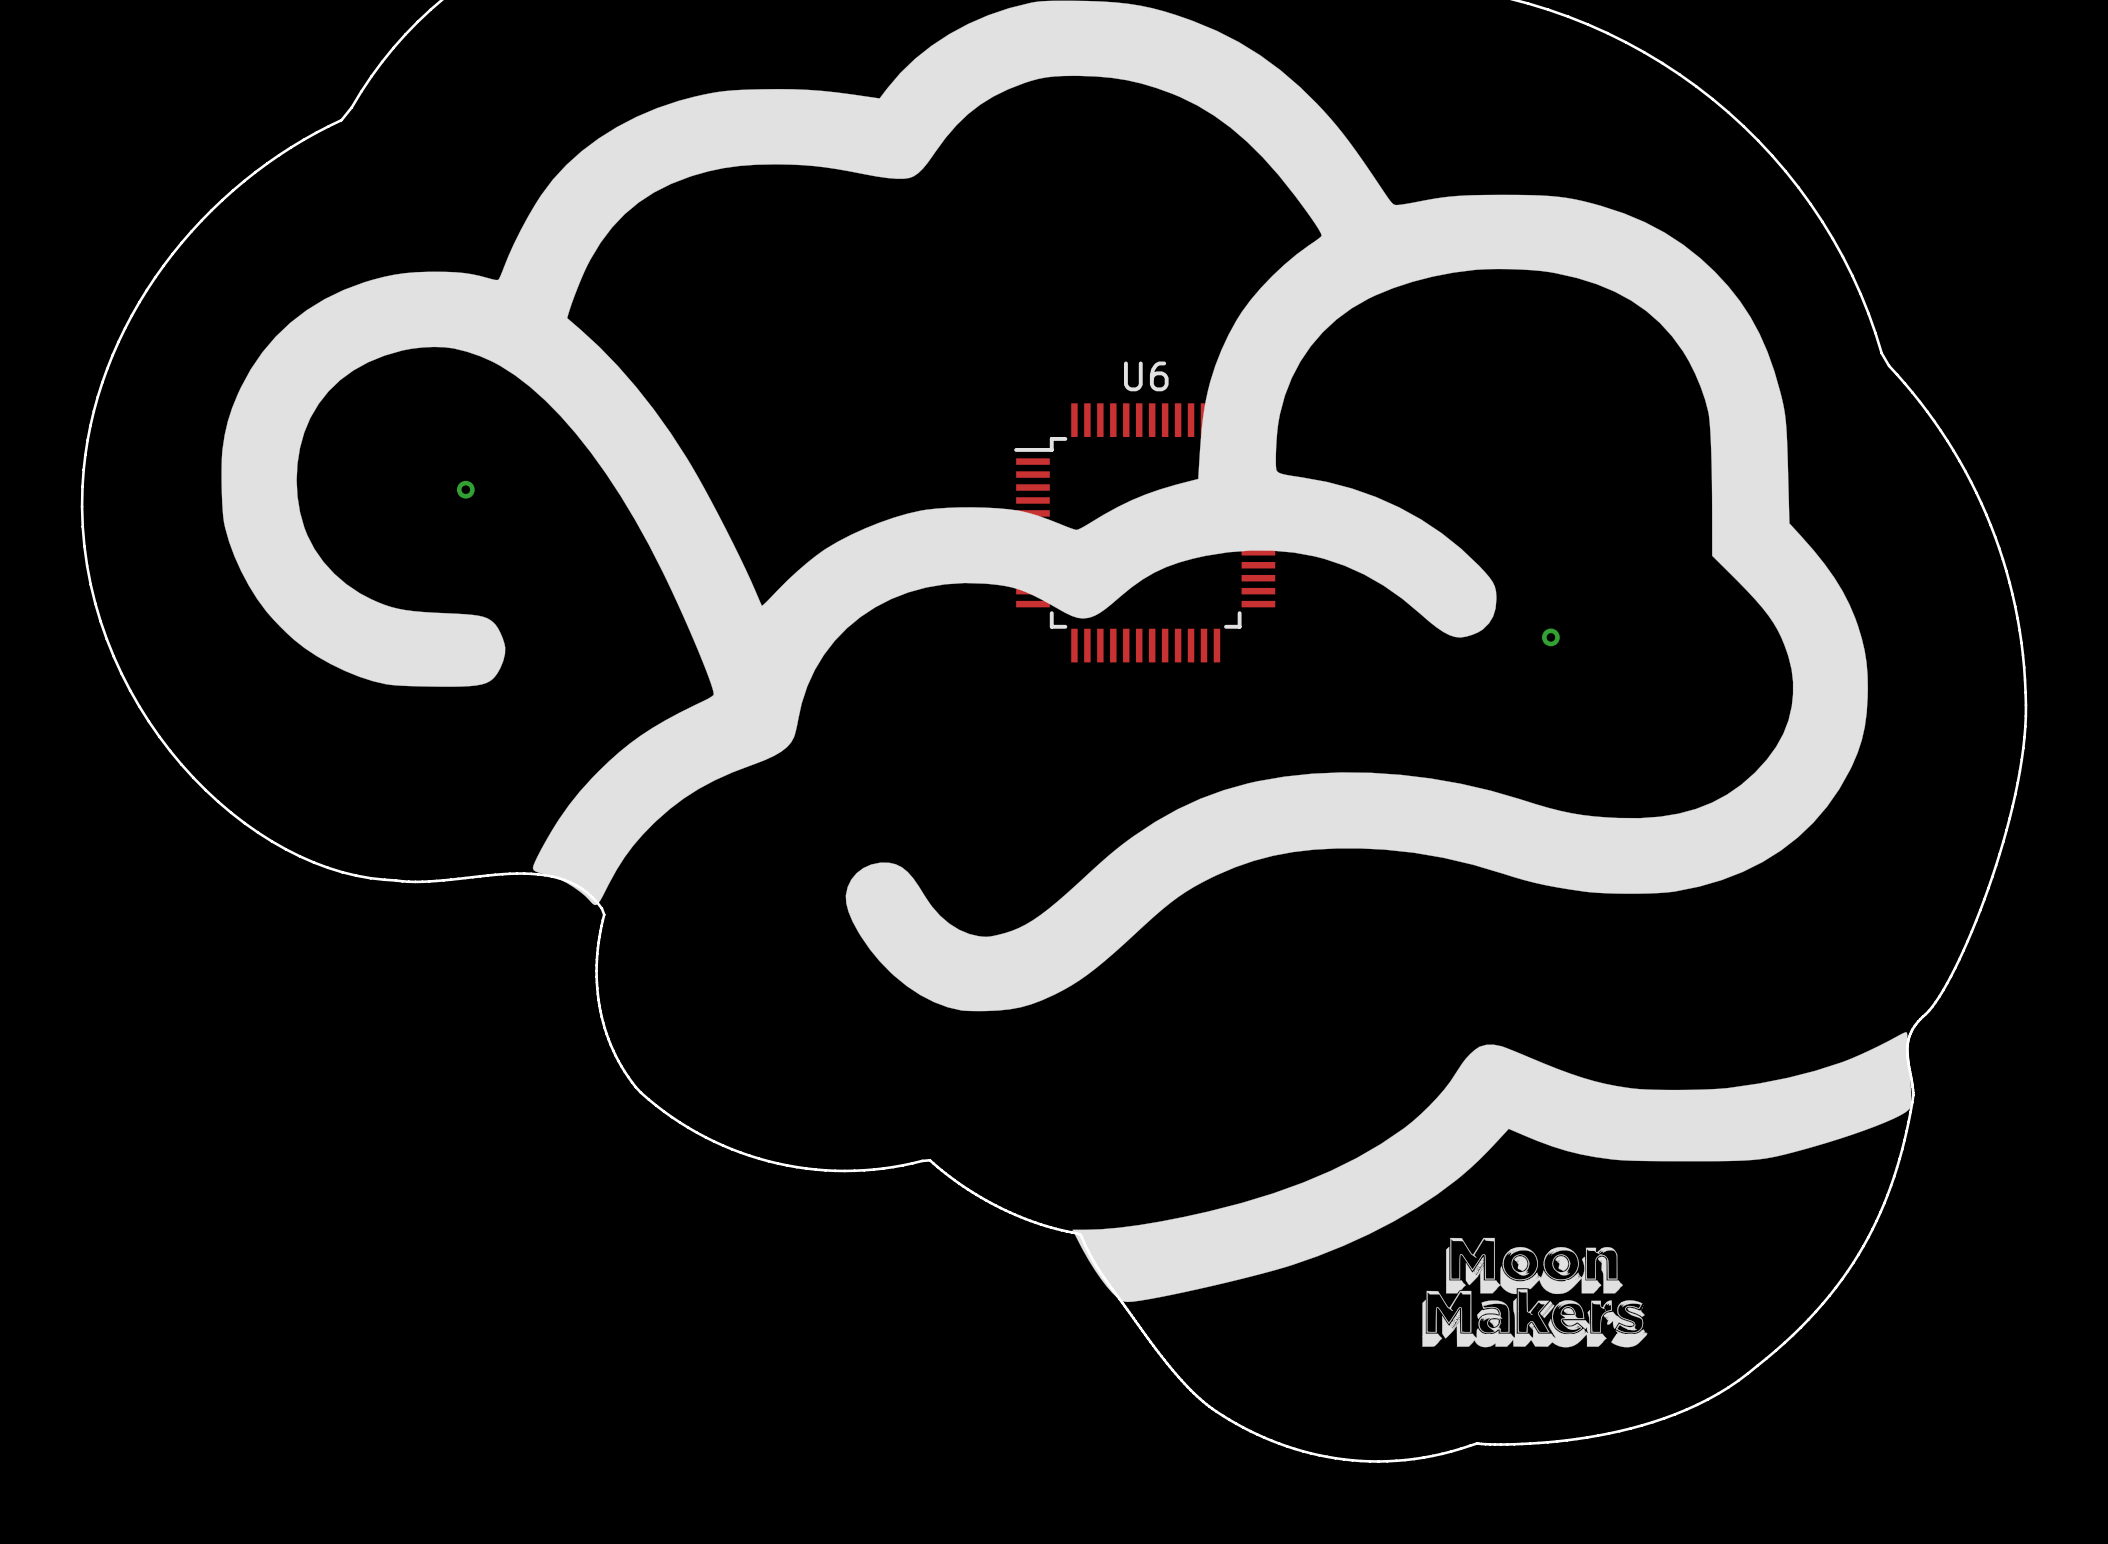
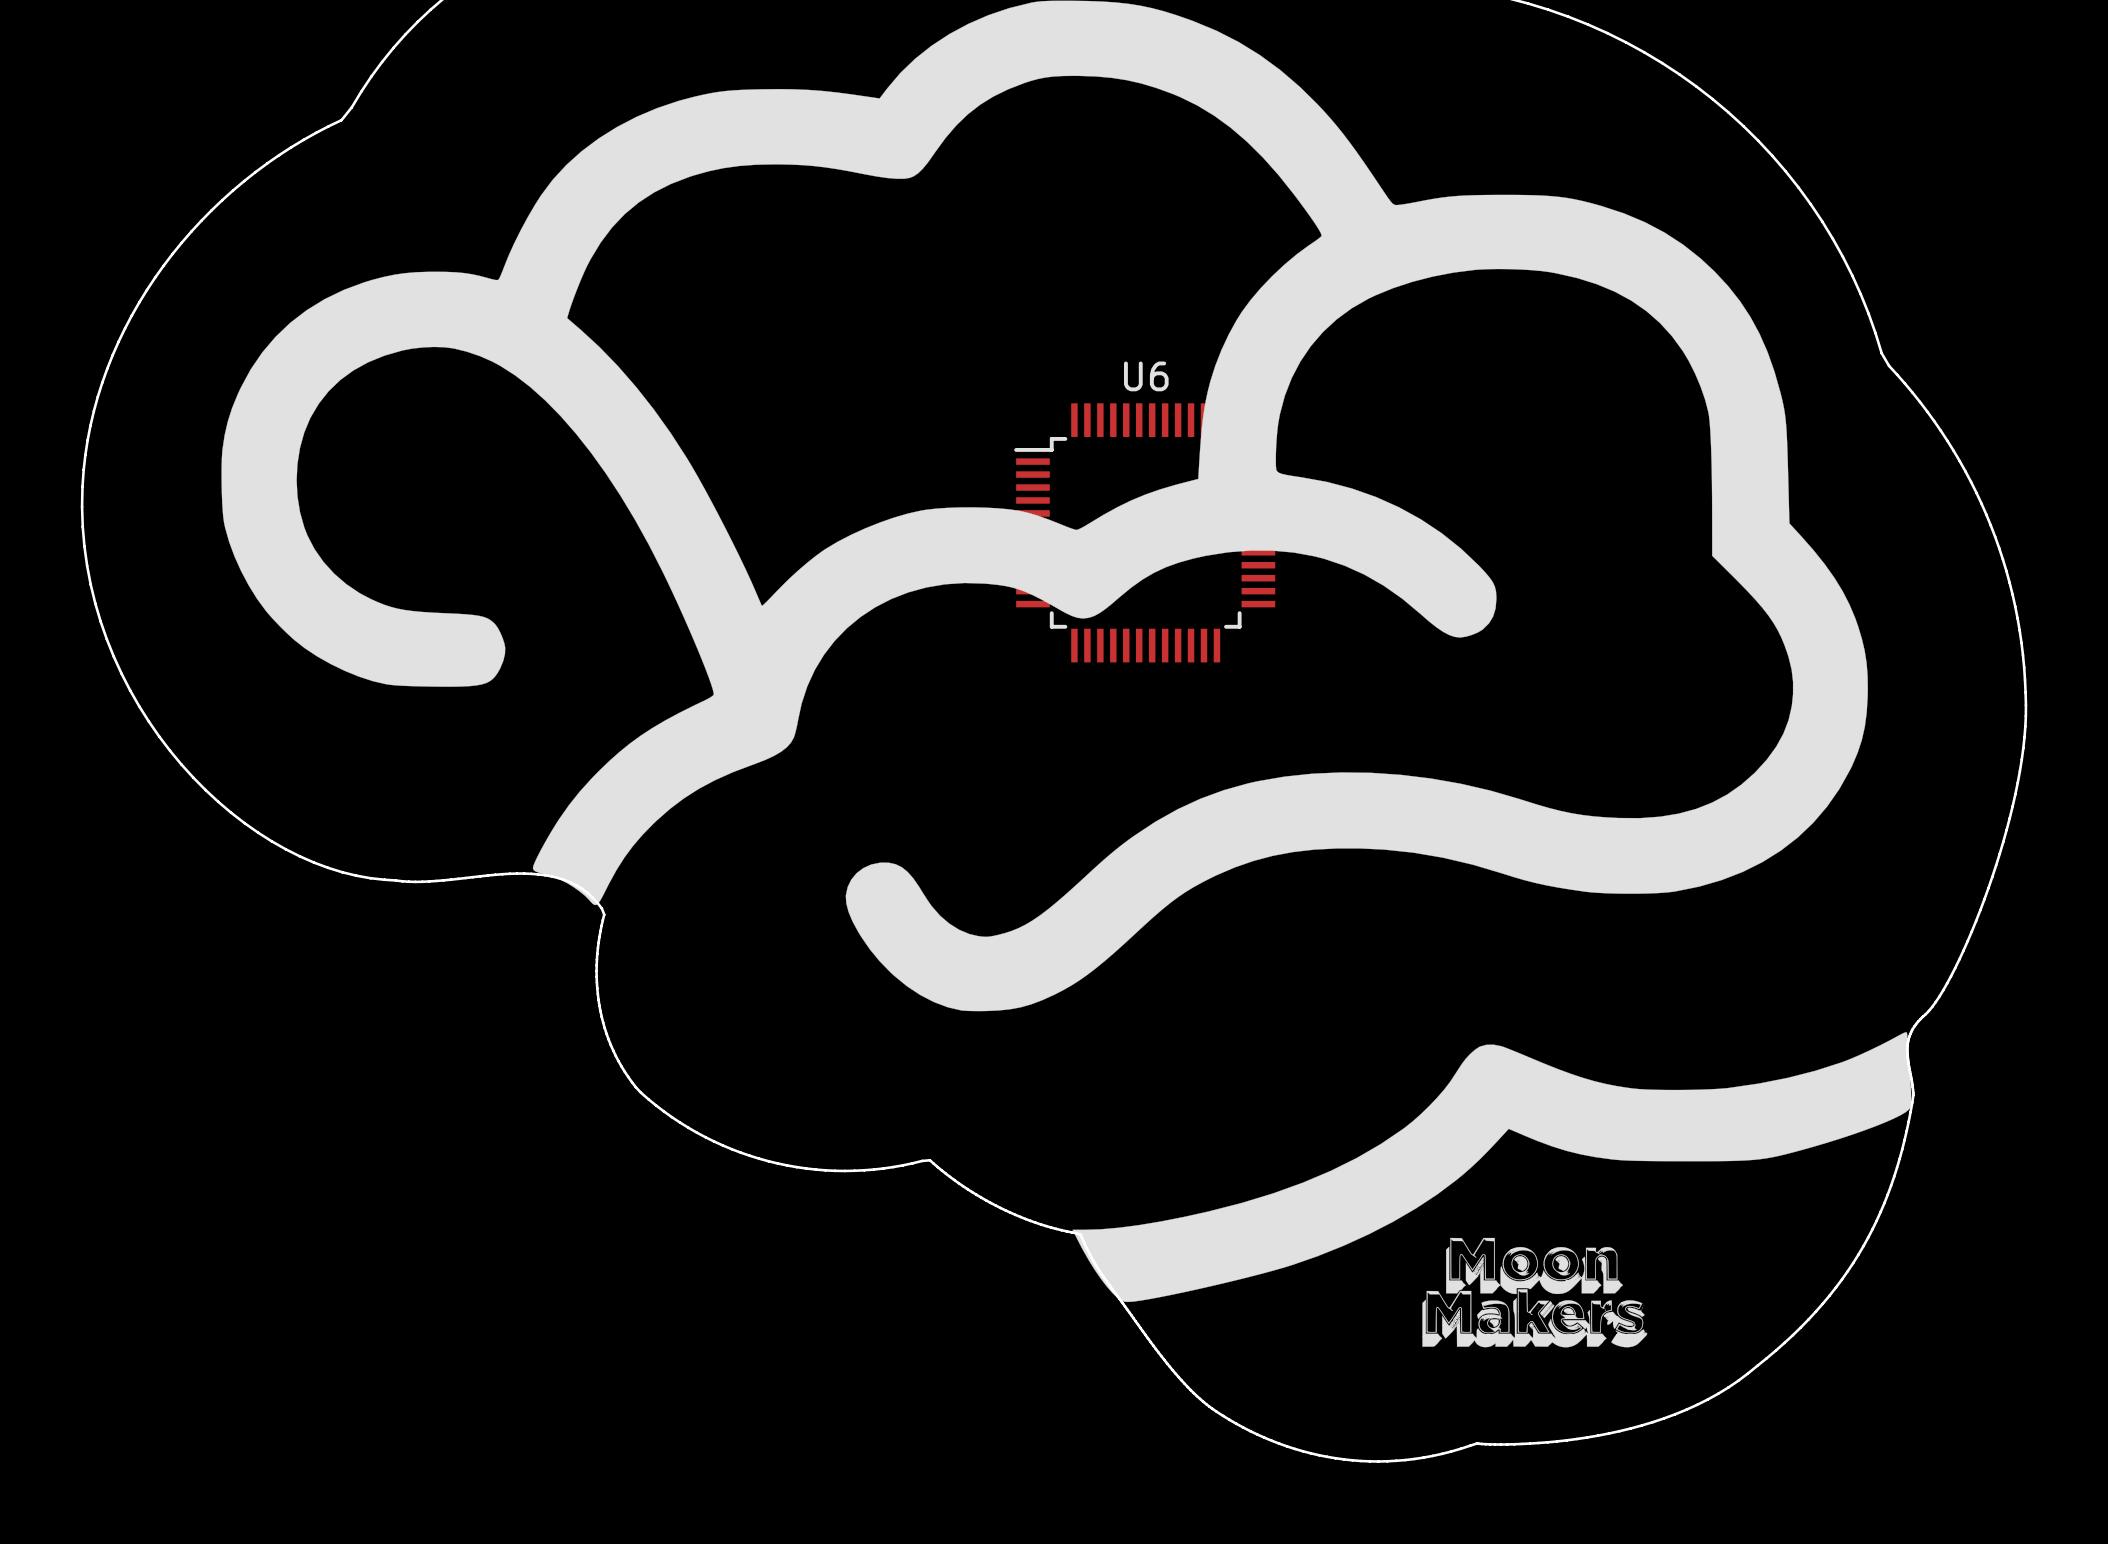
via: (465, 489) -> none
via: (1550, 637) -> none

